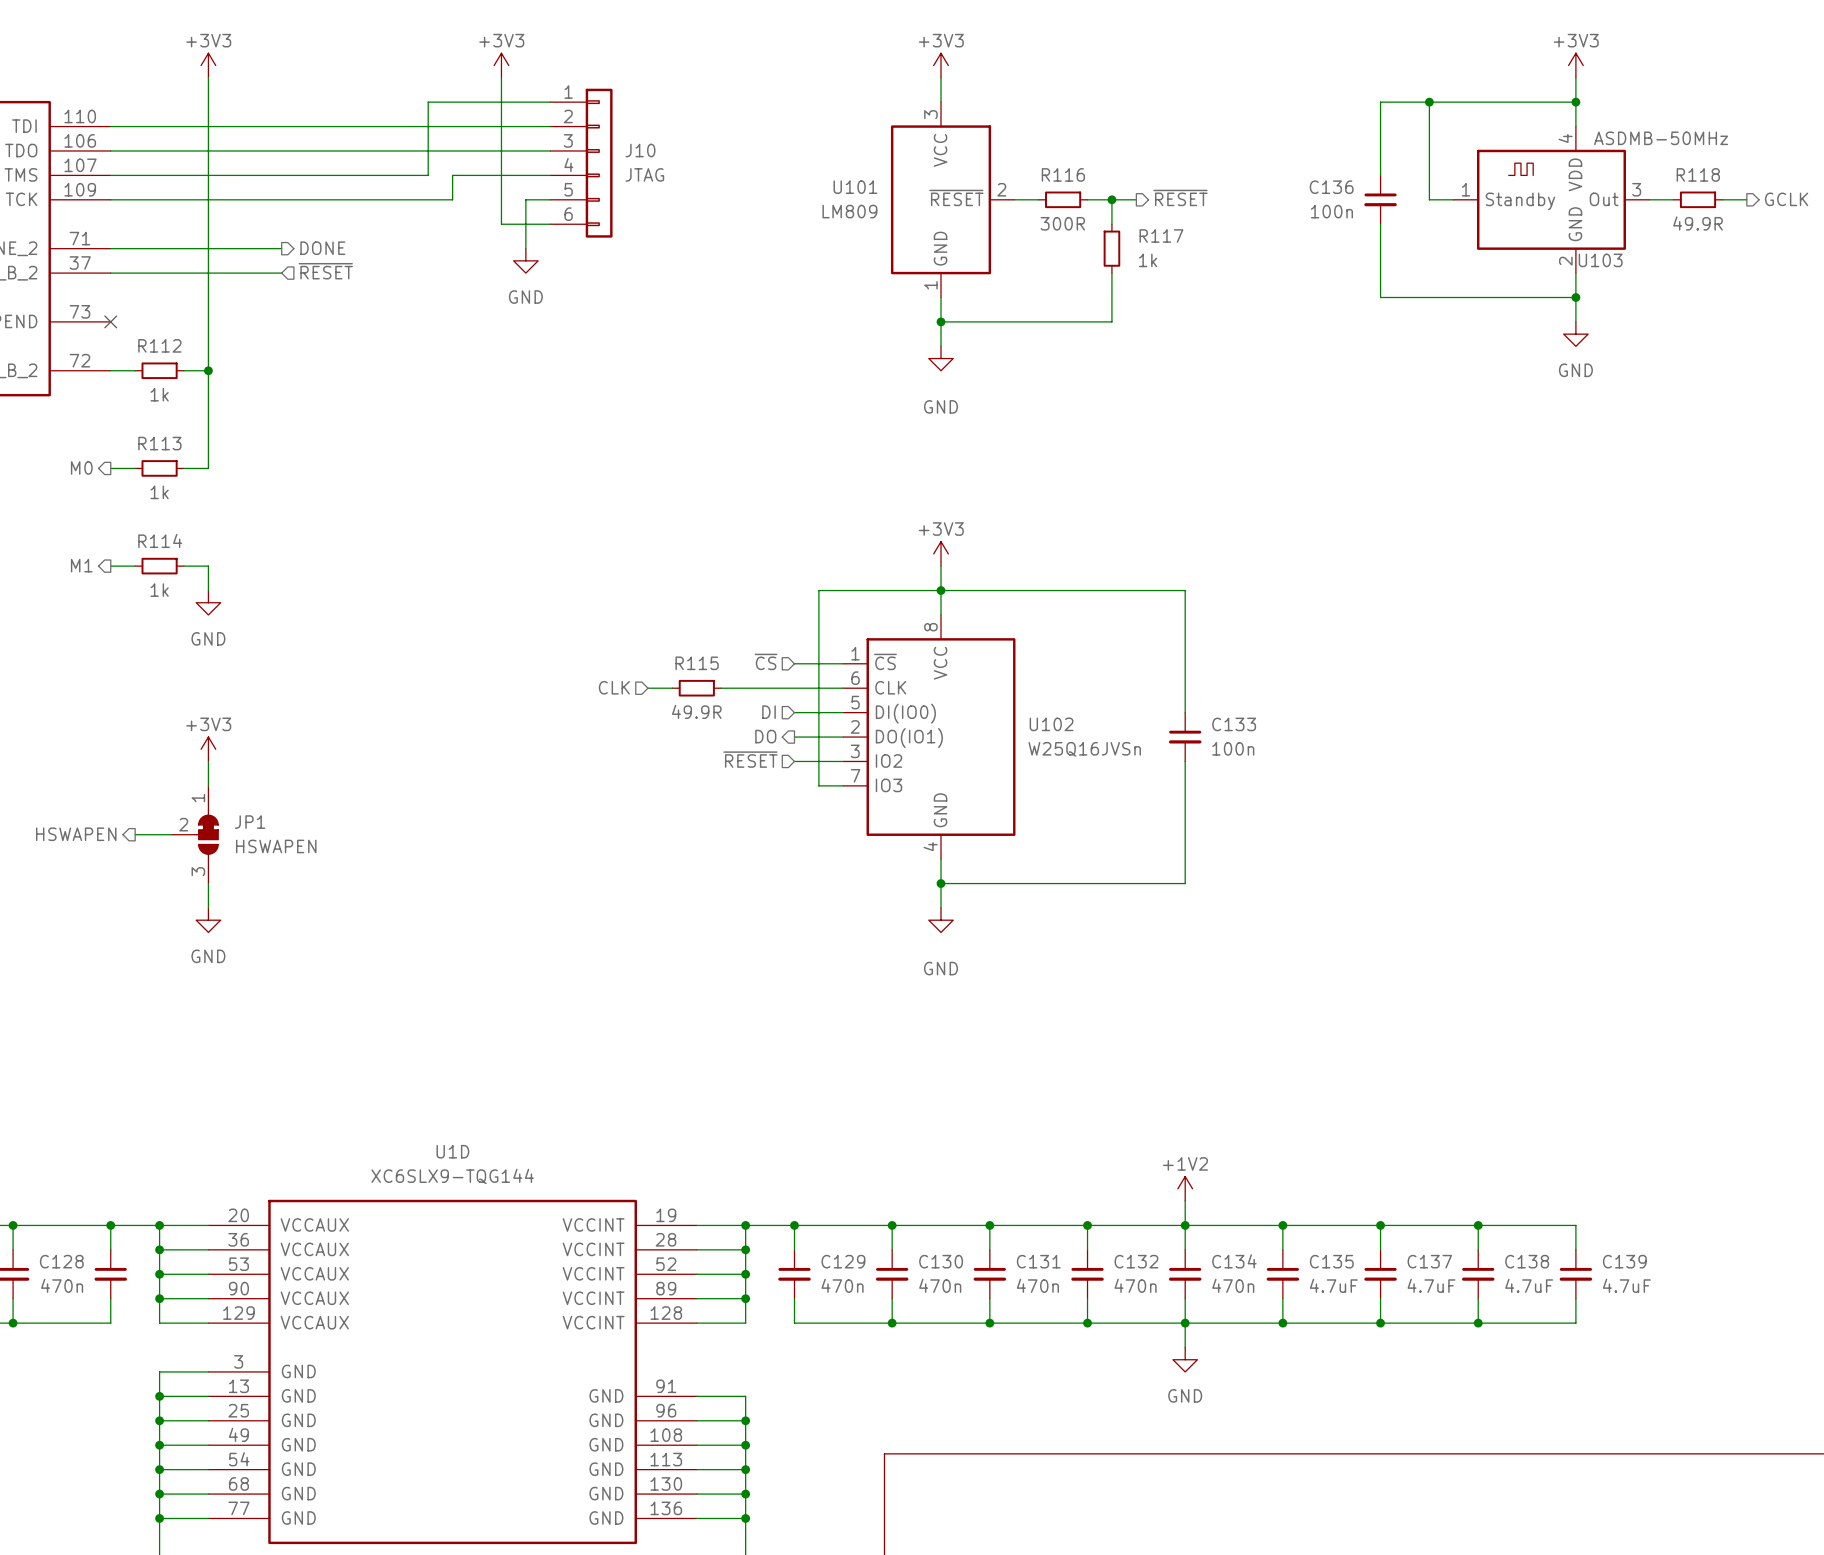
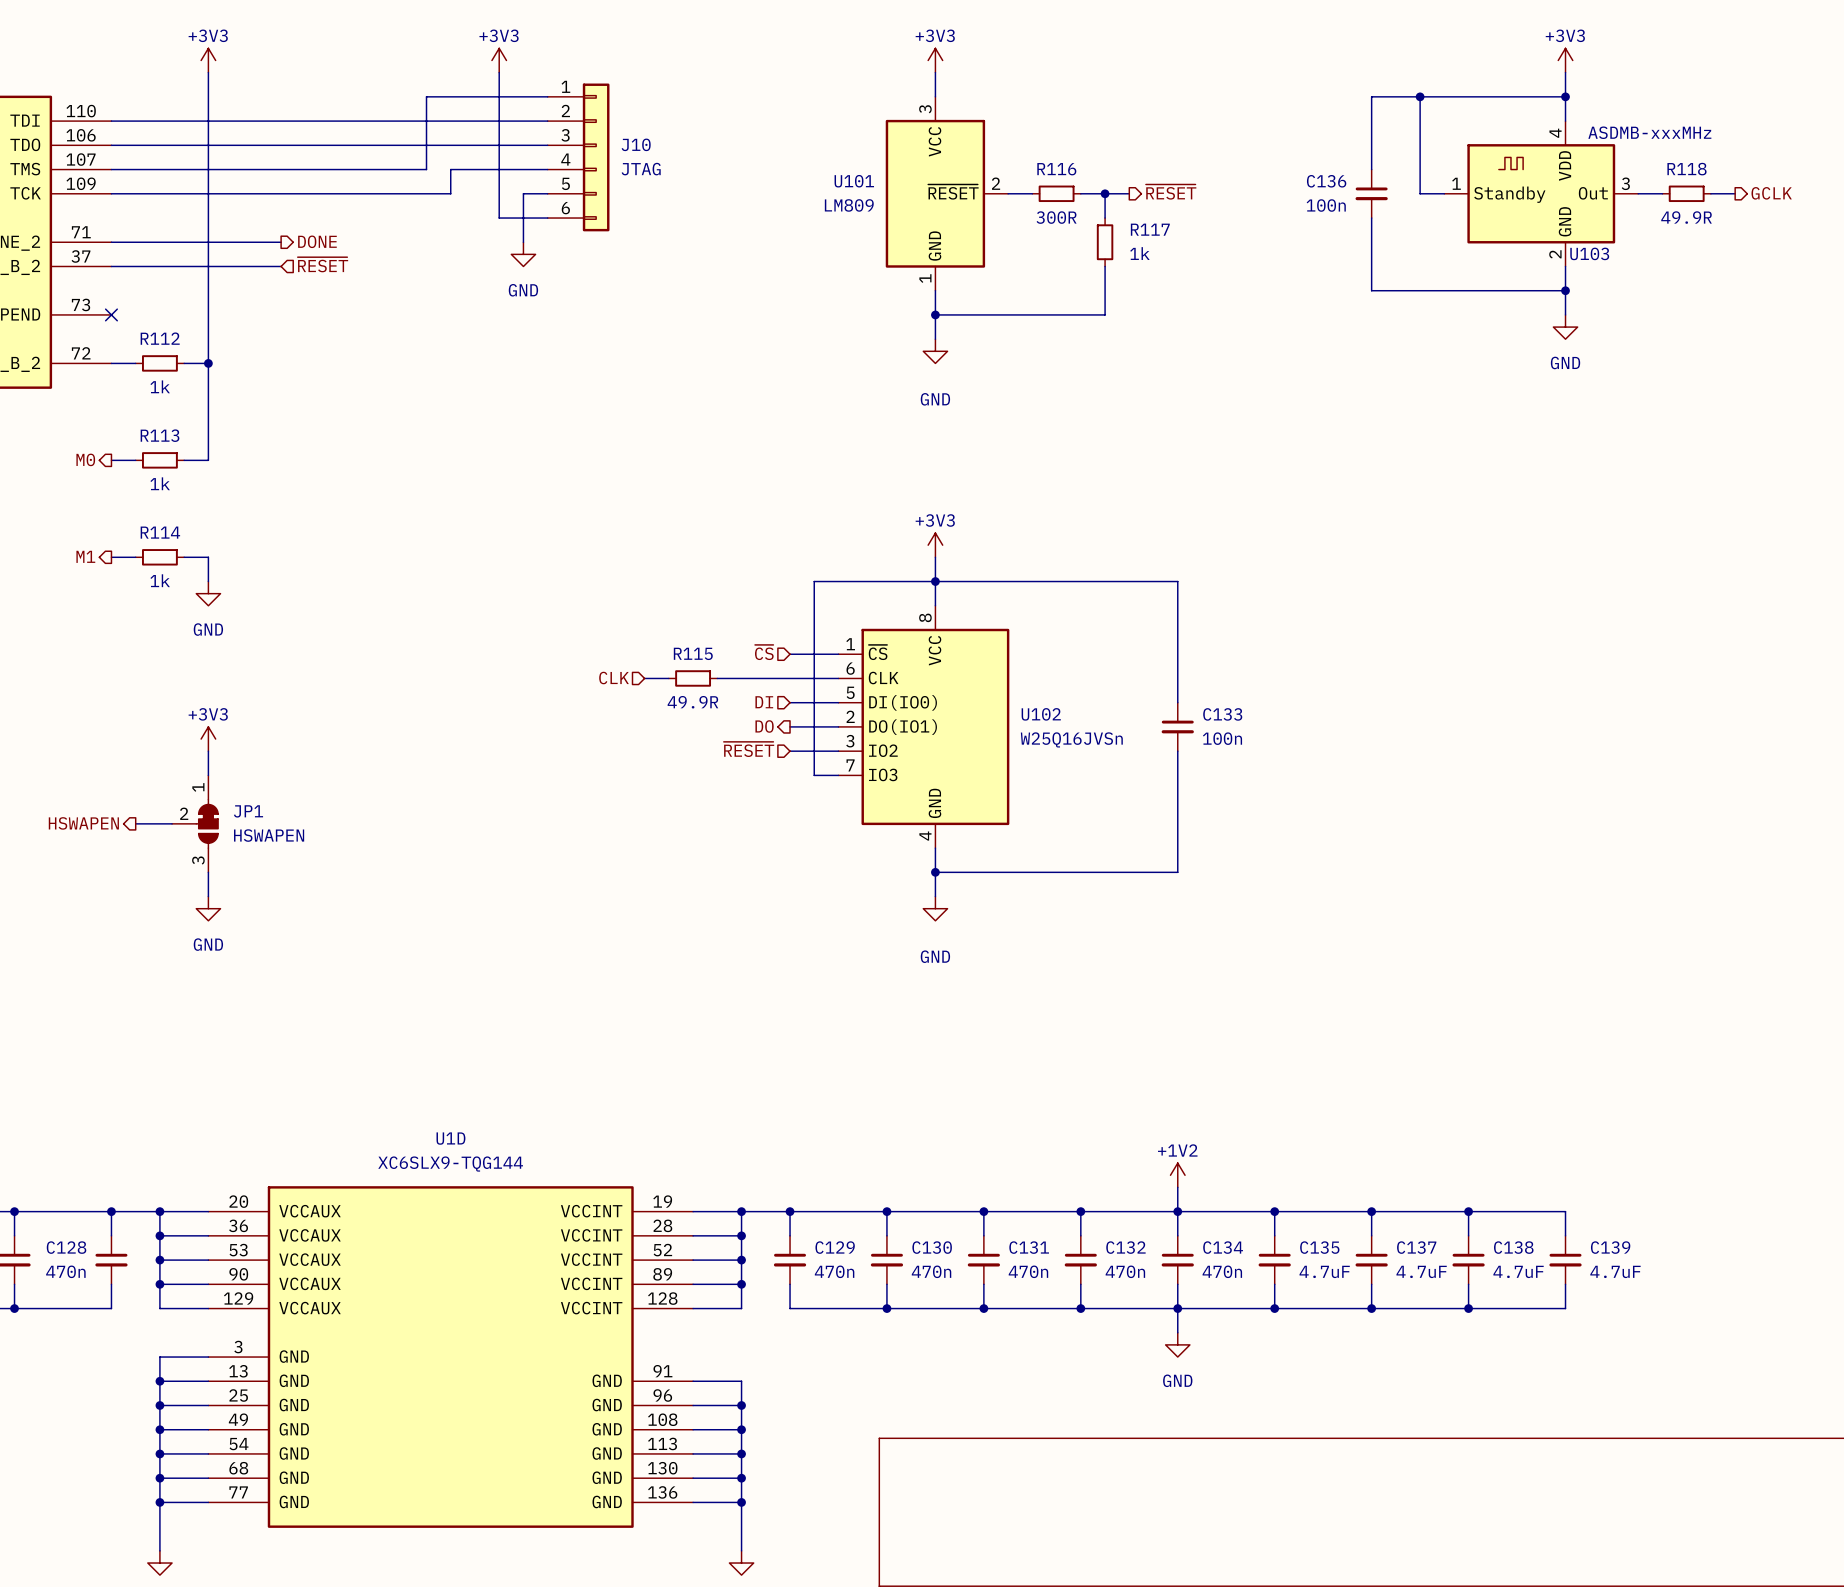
U103 value: ASDMB-50MHz (1661, 138) -> ASDMB-xxxMHz (1649, 132)

